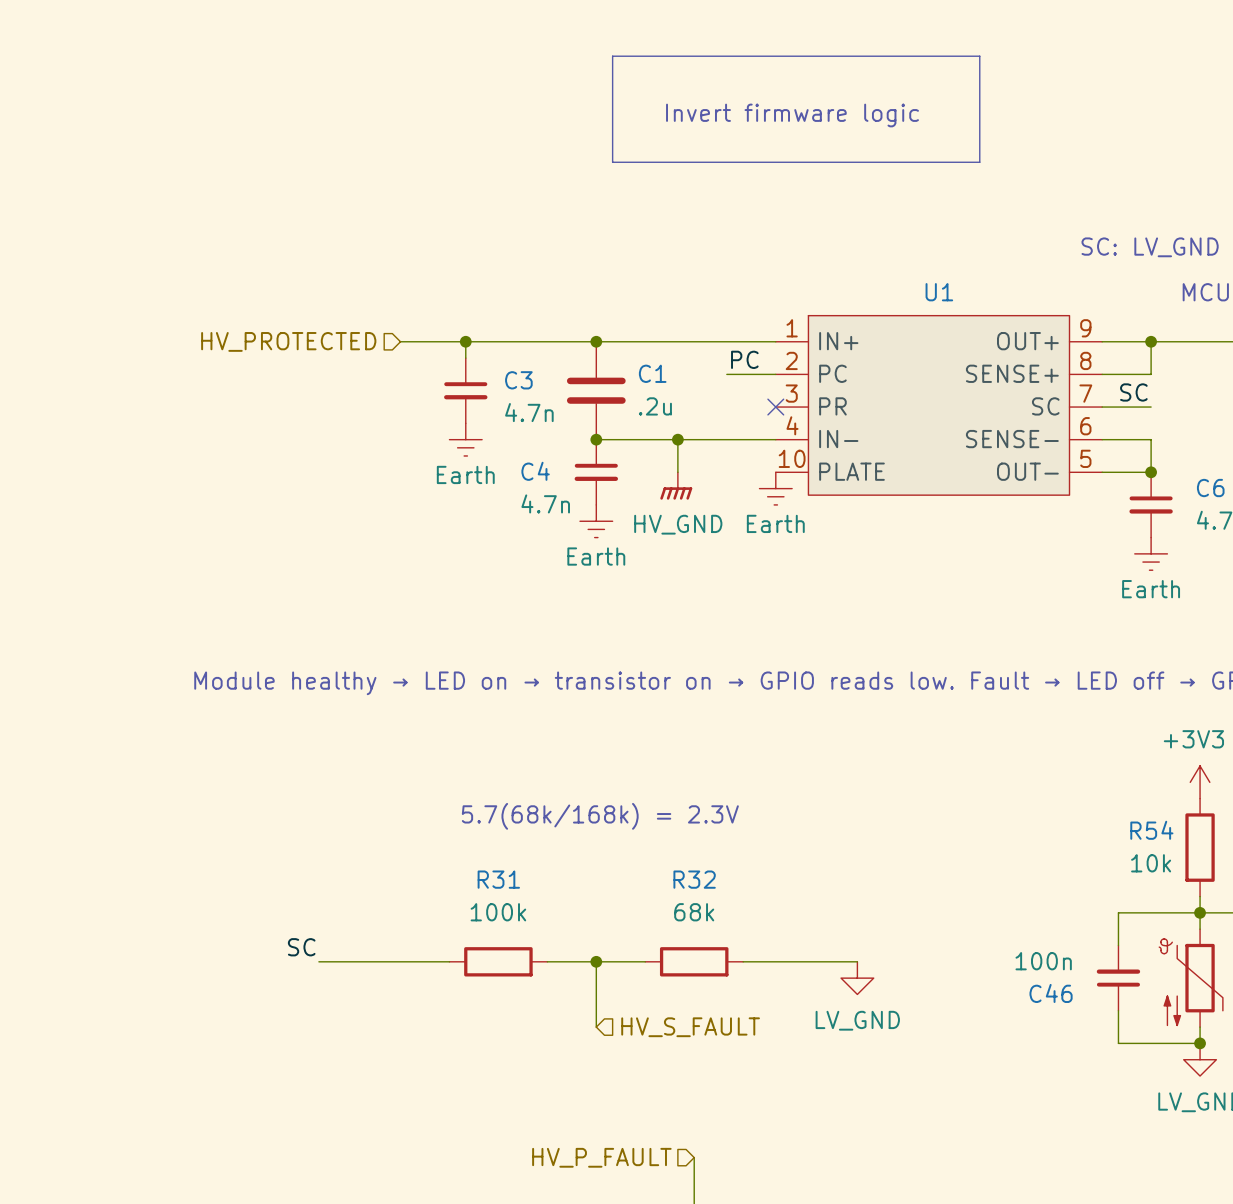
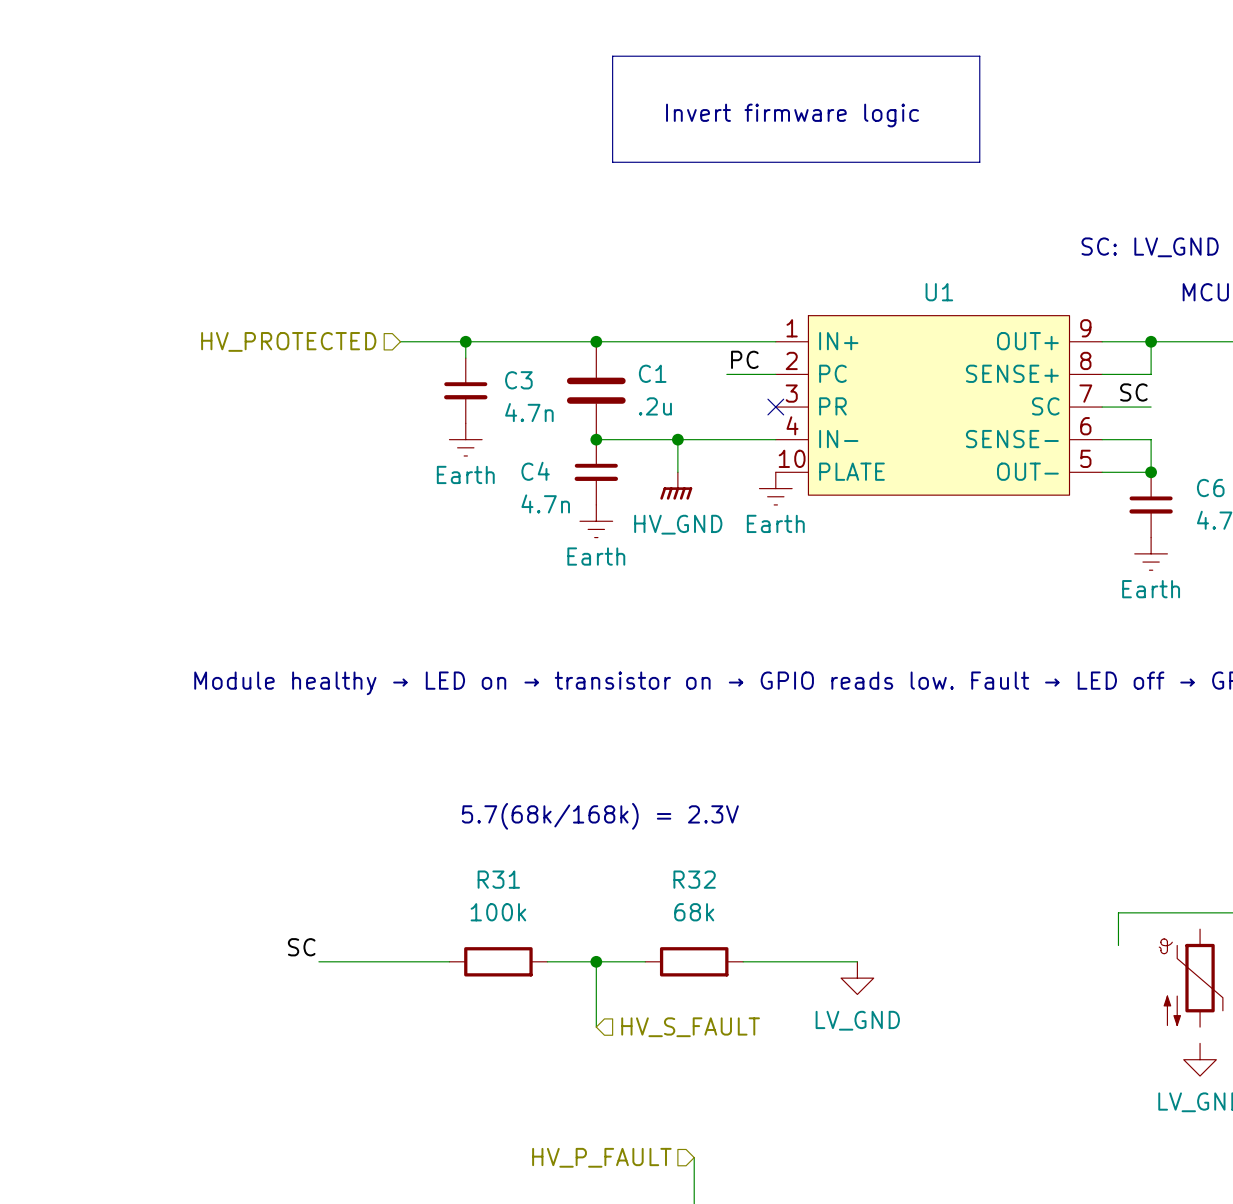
power symbol: +3V3 (1200, 782) -> none
R54: 10k (1200, 847) -> none
wire: (1200, 896) (1200, 929) -> none
junction: (1200, 912) -> none
C46: 100n (1118, 978) -> none
wire: (1118, 1010) (1118, 1043) (1200, 1043) (1200, 1027) -> none
junction: (1200, 1043) -> none

